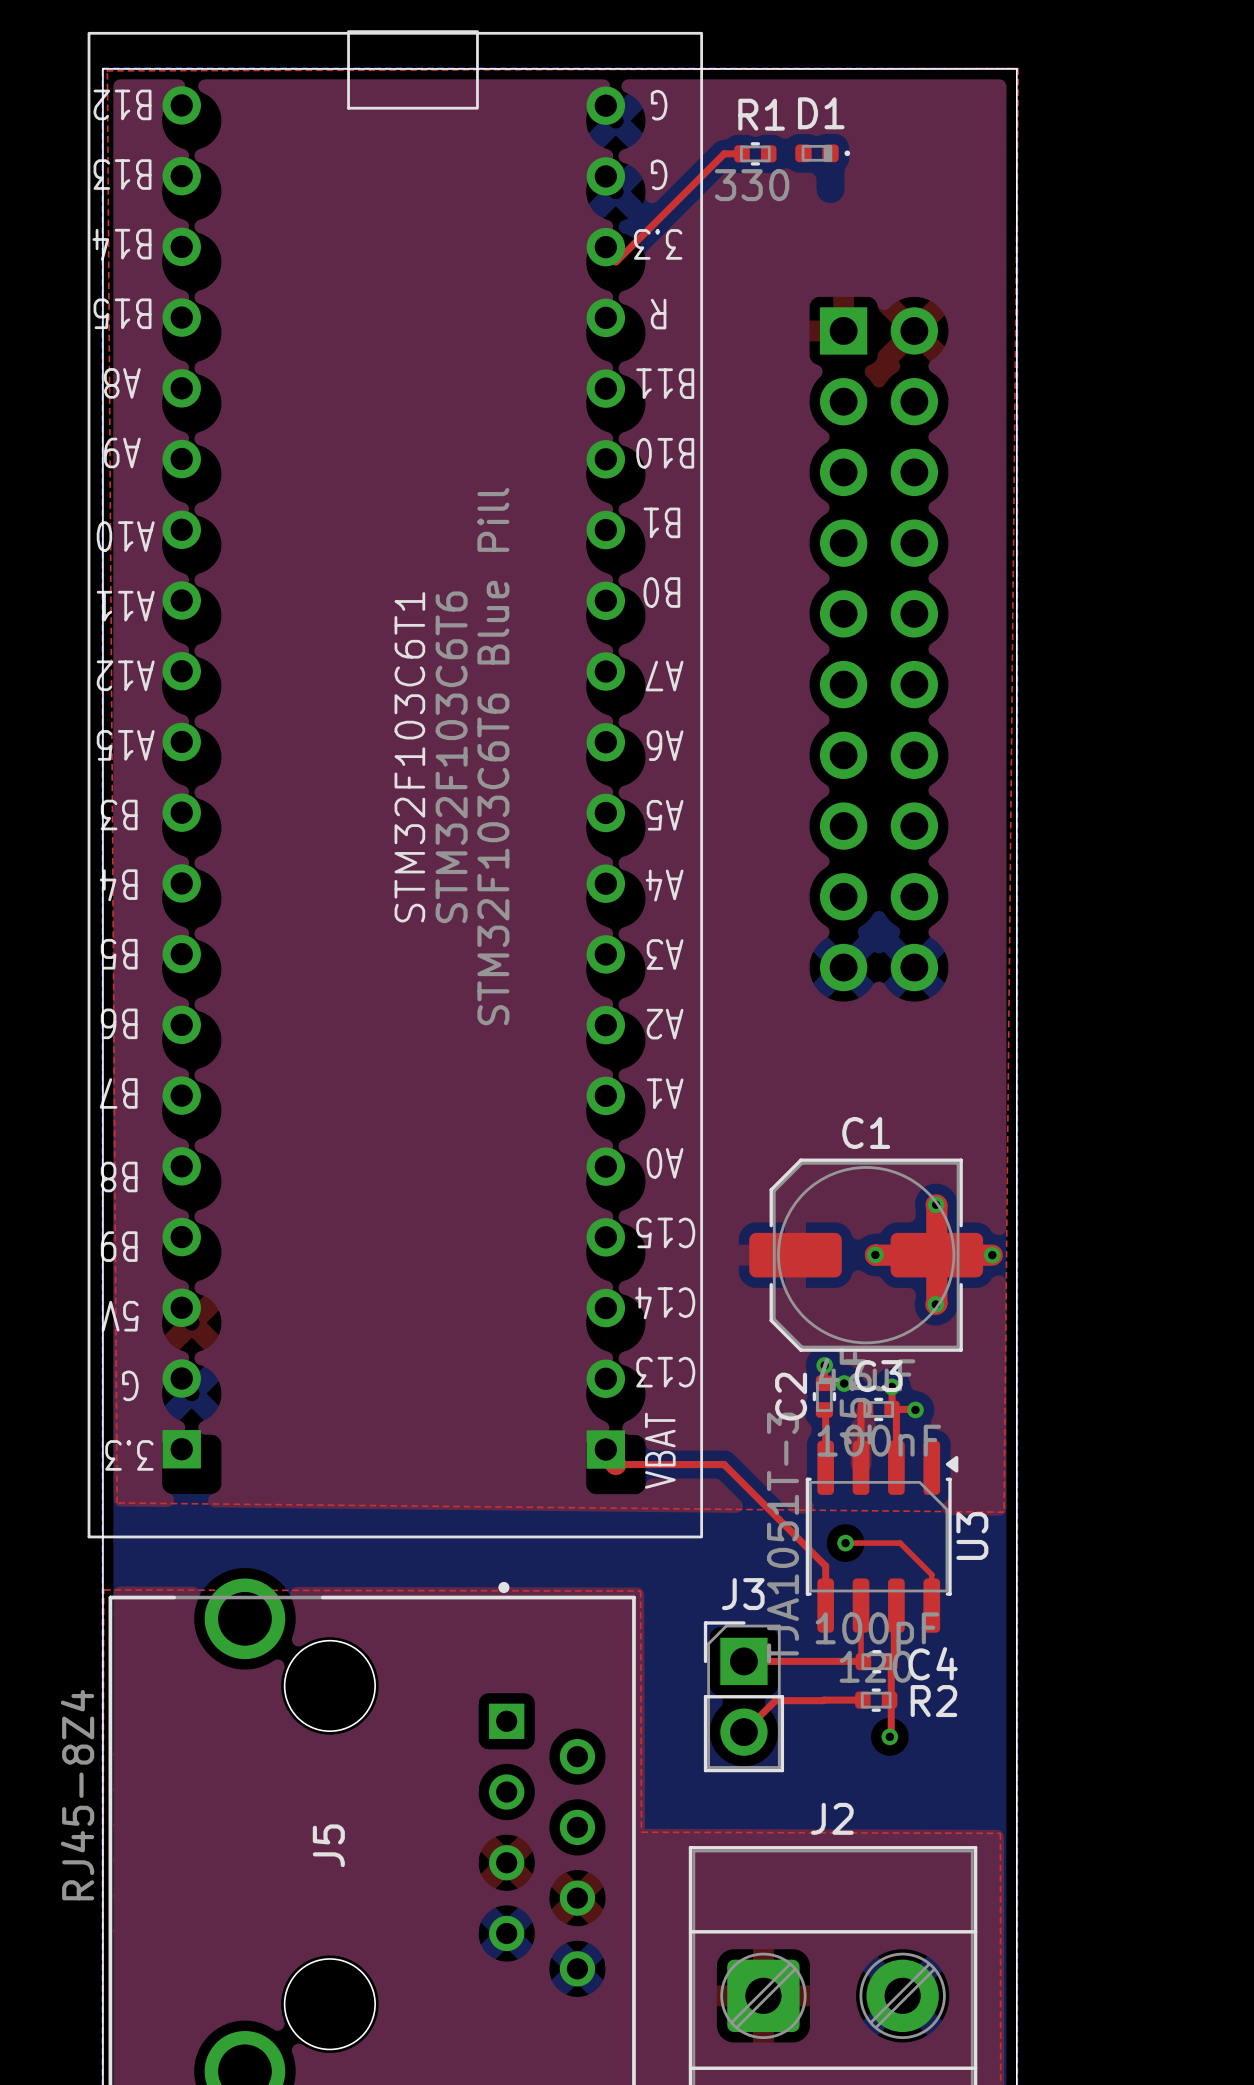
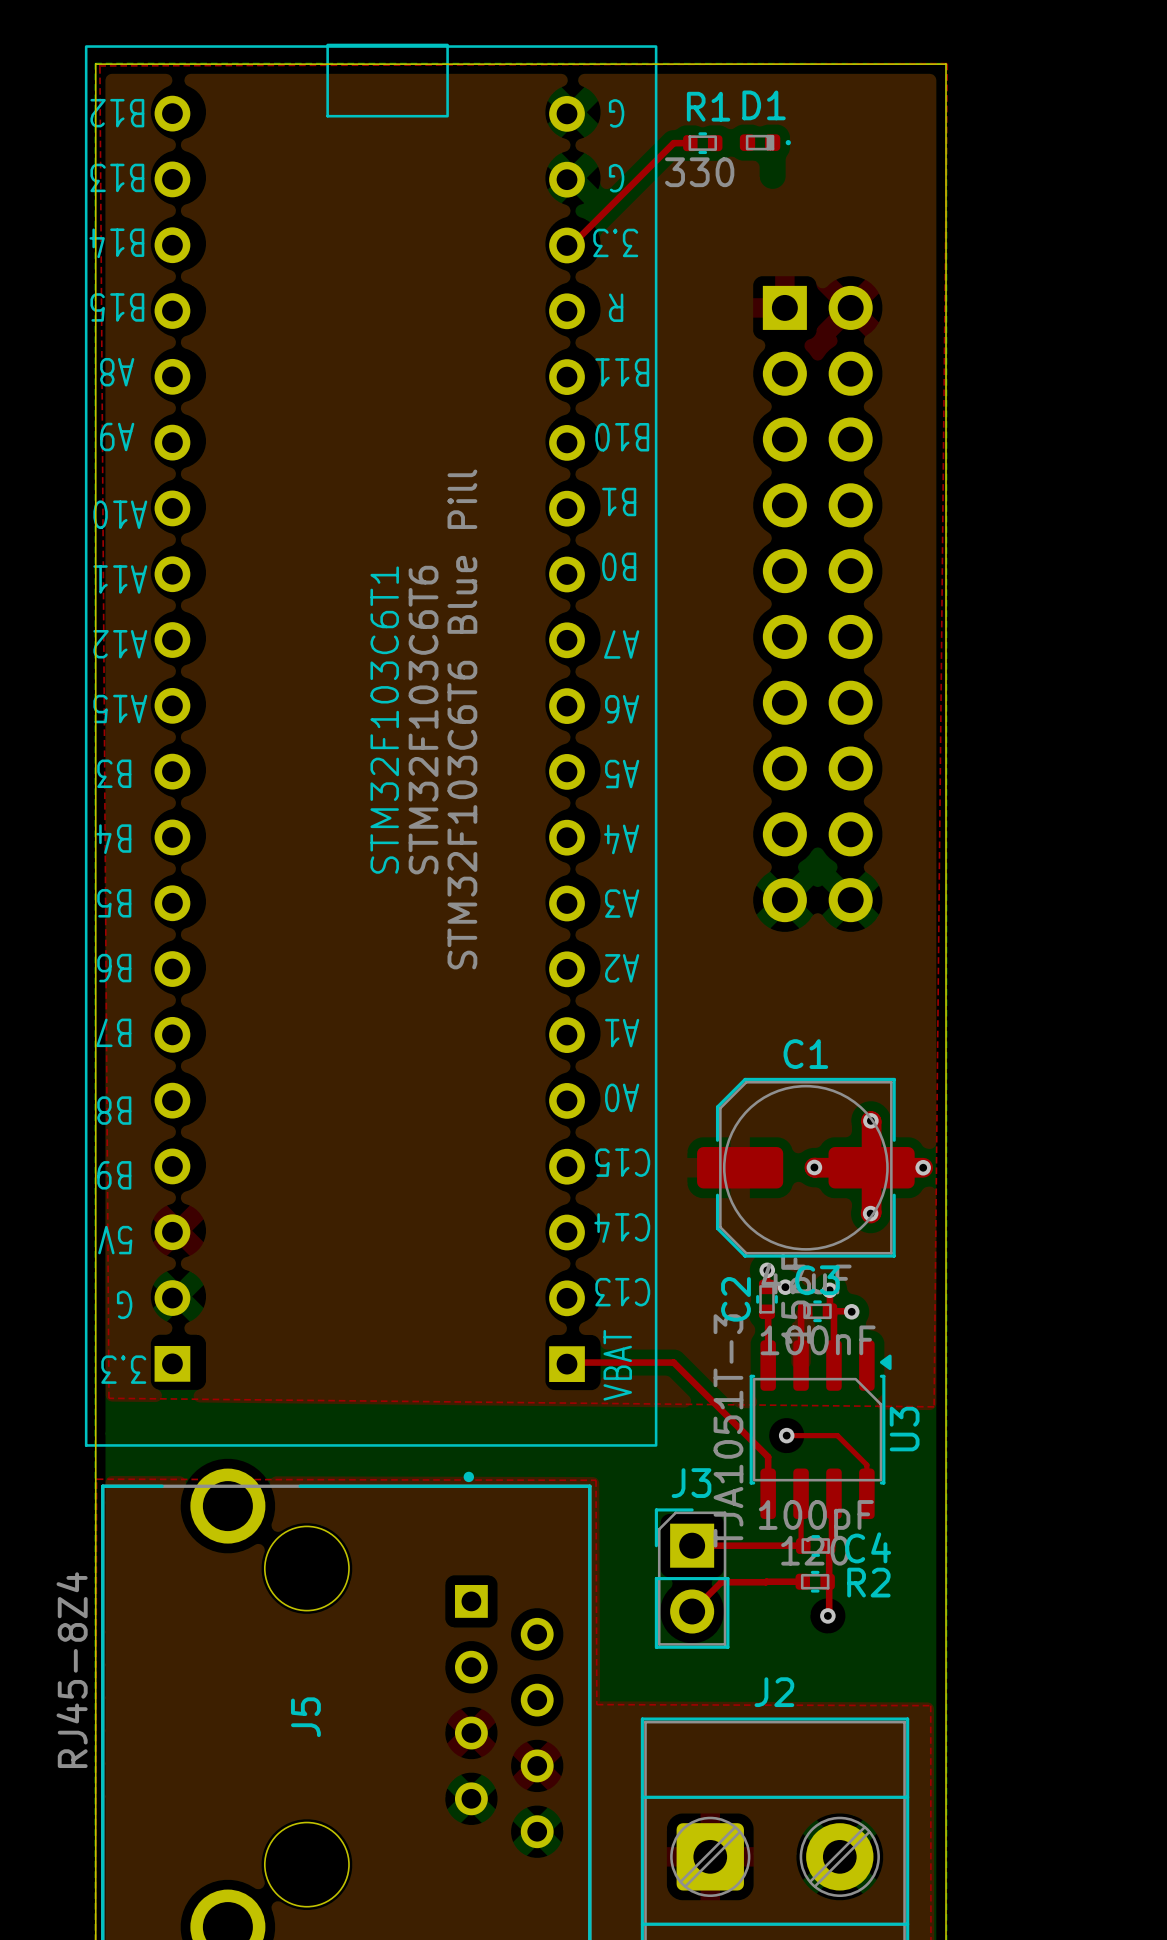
STM32F103C6T1 position: (395, 784) -> (371, 745)

